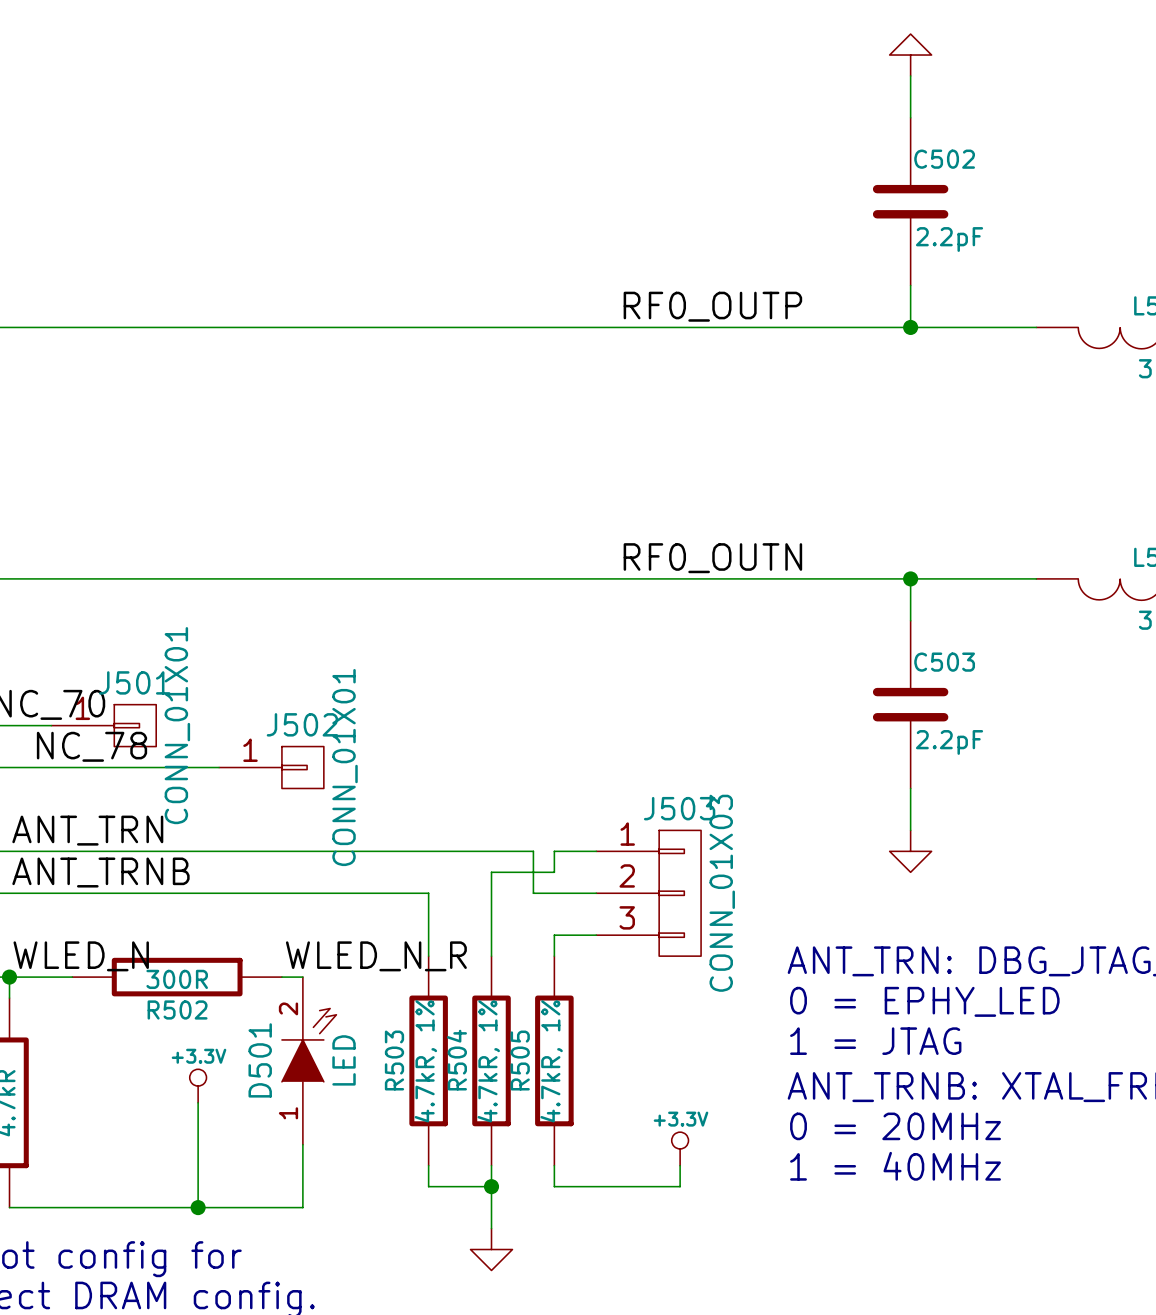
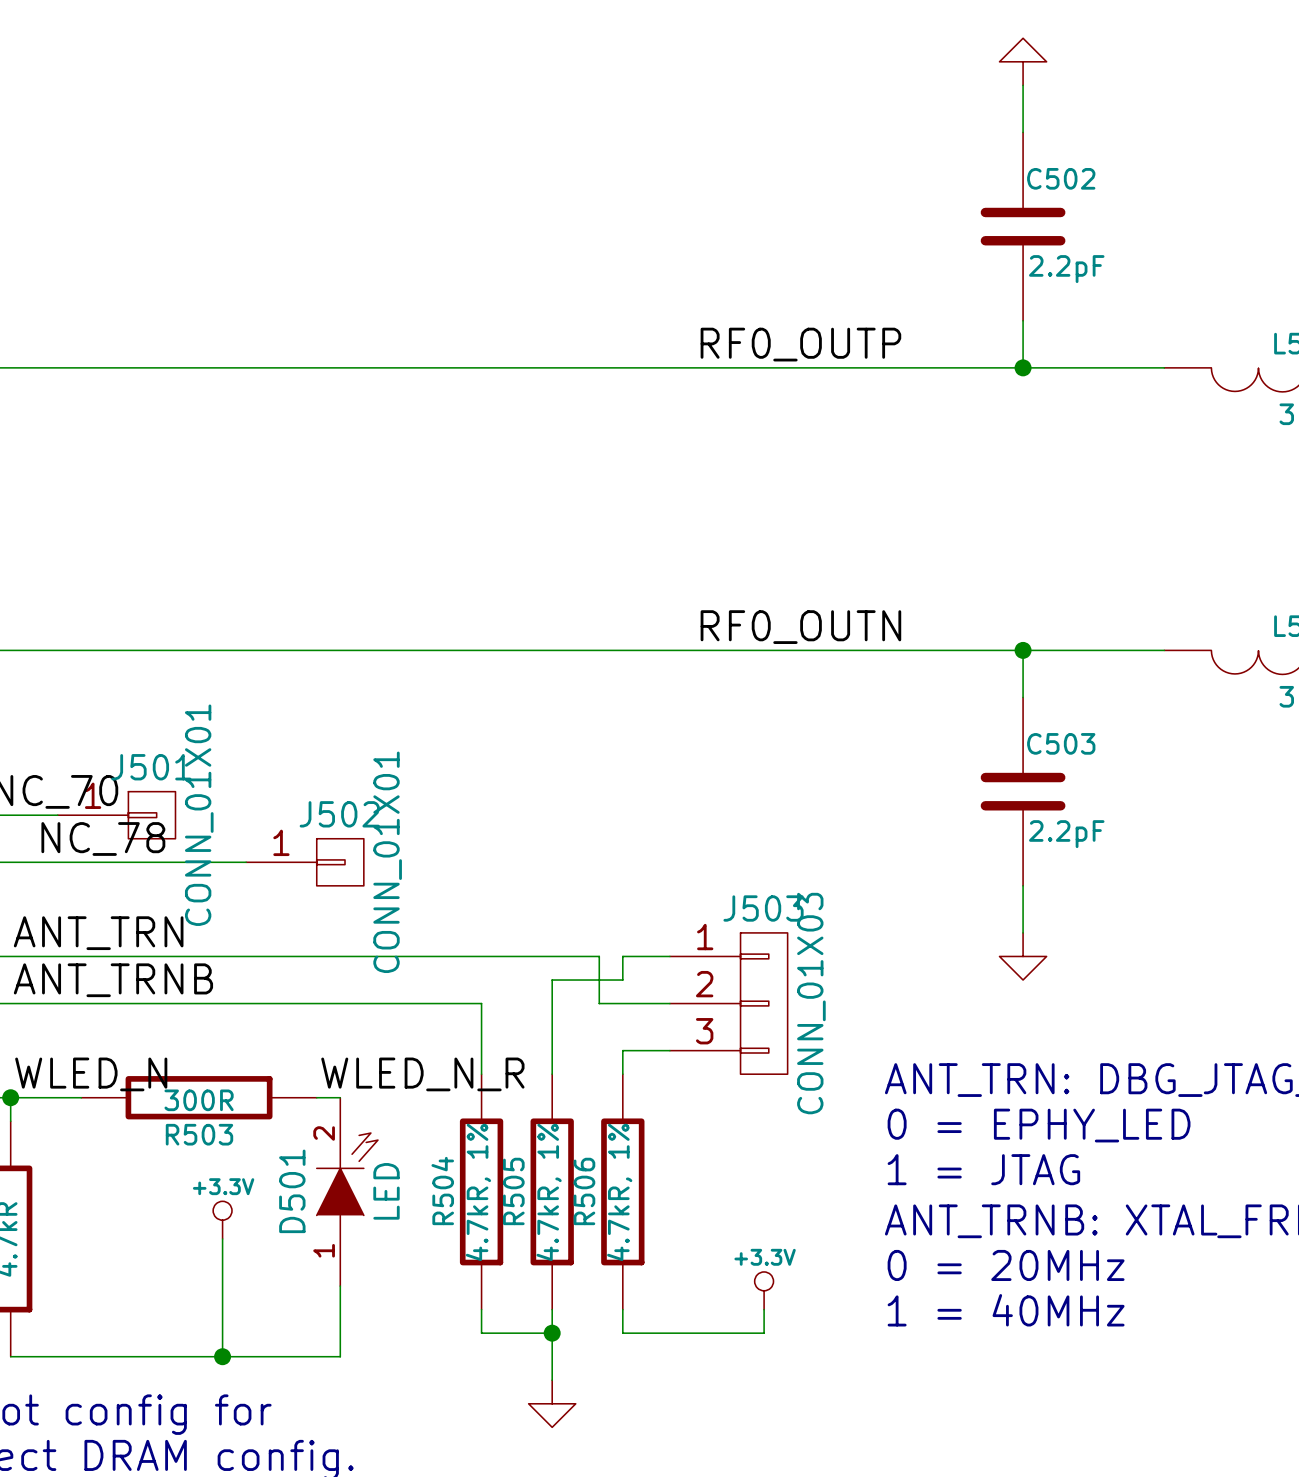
R502 name: R502 (177, 1009) -> R503 (199, 1134)
R503 name: R503 (394, 1060) -> R504 (442, 1191)
R504 name: R504 (456, 1060) -> R505 (513, 1191)
R505 name: R505 (520, 1060) -> R506 (584, 1191)

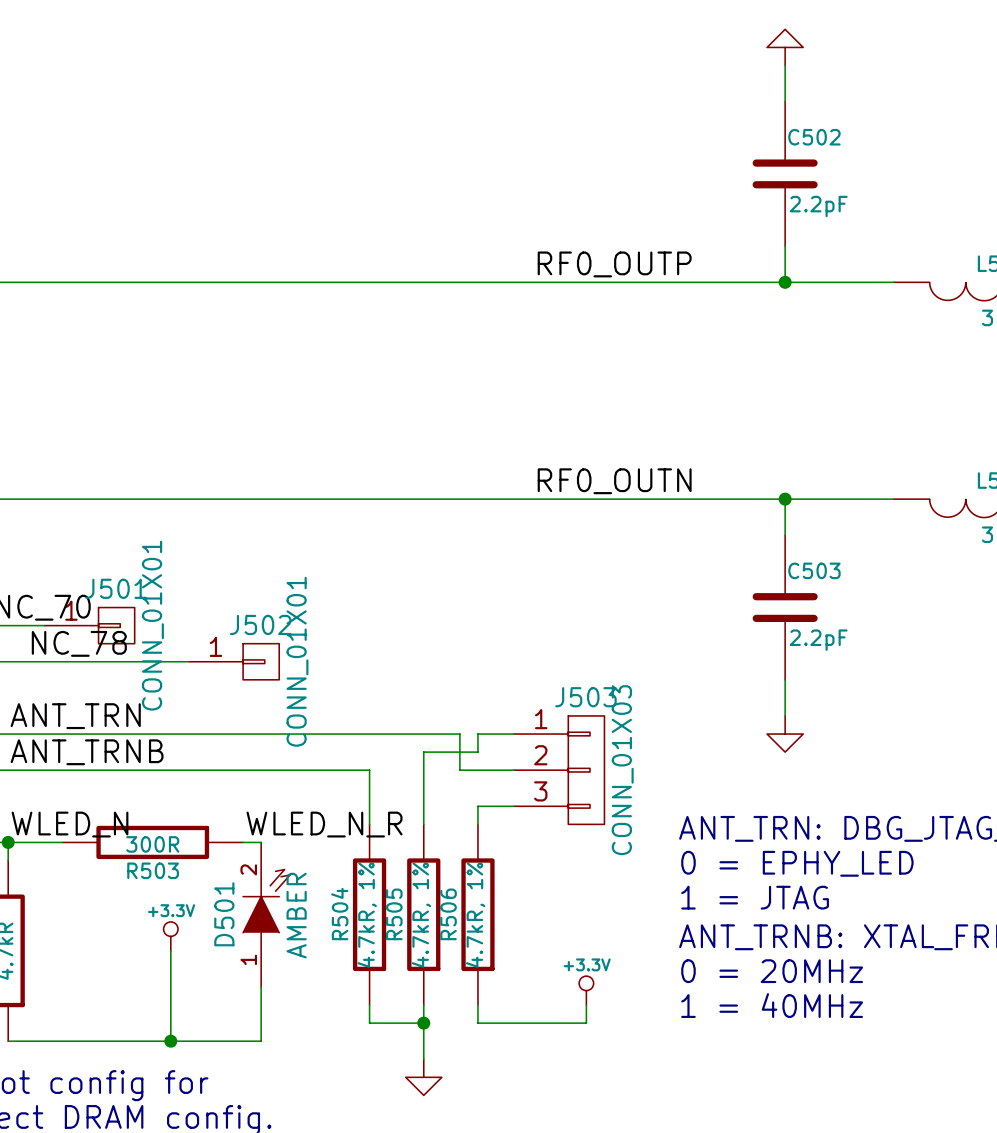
D501 value: LED (386, 1191) -> AMBER (296, 915)

